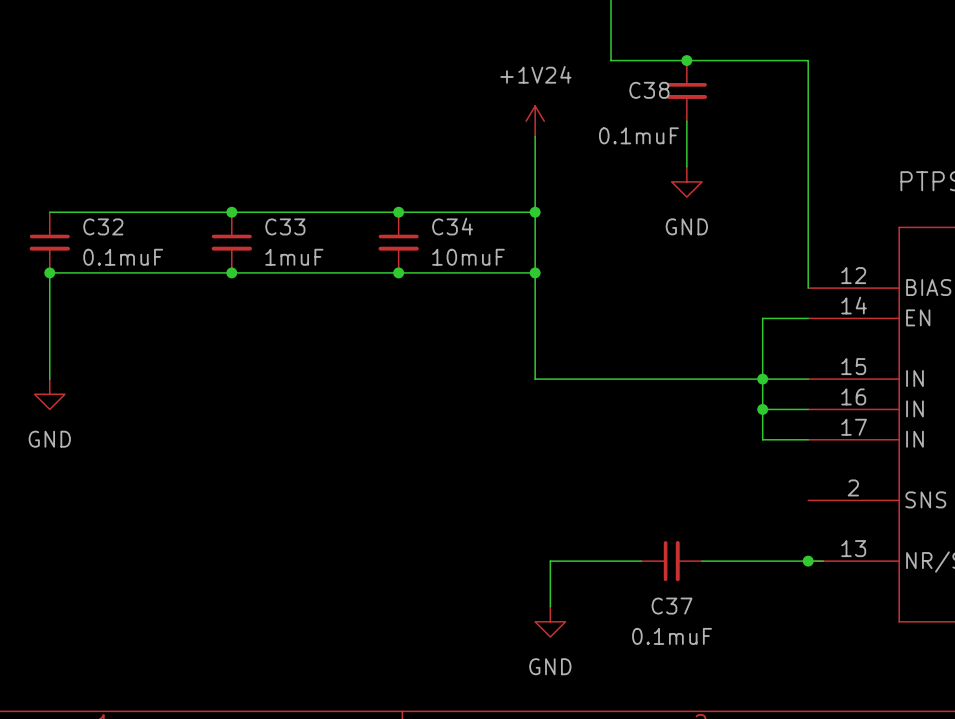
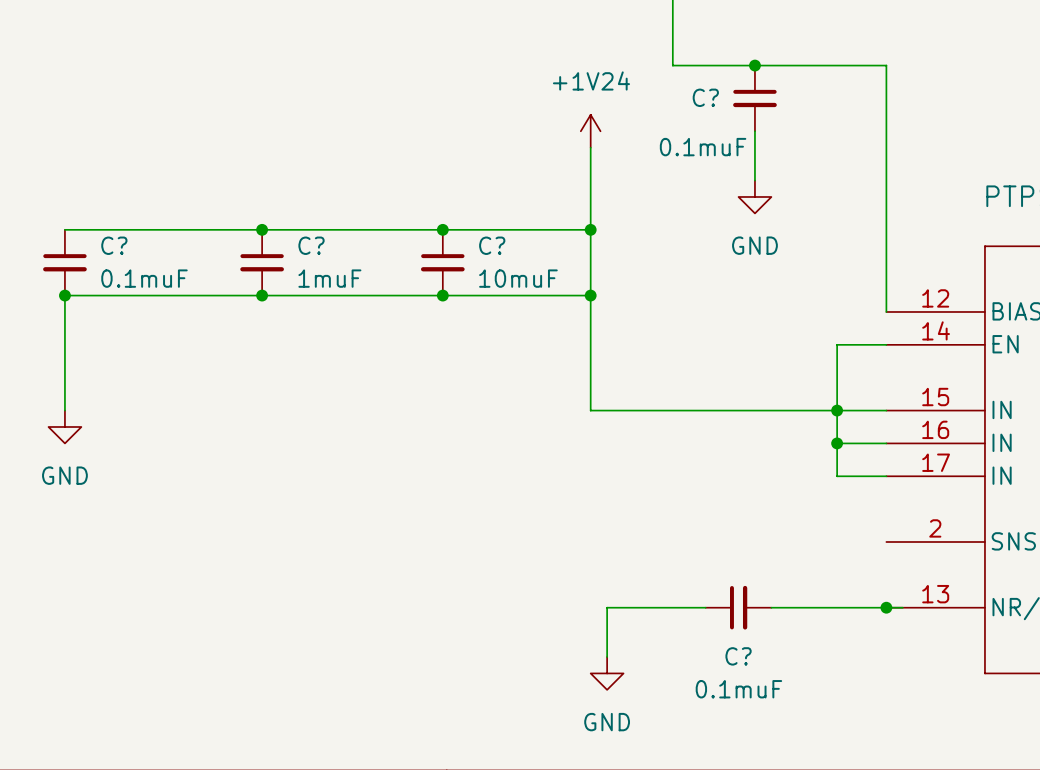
C38 name: C38 (649, 90) -> C? (705, 97)
C32 name: C32 (103, 226) -> C? (114, 245)
C33 name: C33 (285, 226) -> C? (311, 245)
C34 name: C34 (452, 226) -> C? (492, 245)
C37 name: C37 (672, 606) -> C? (738, 656)

